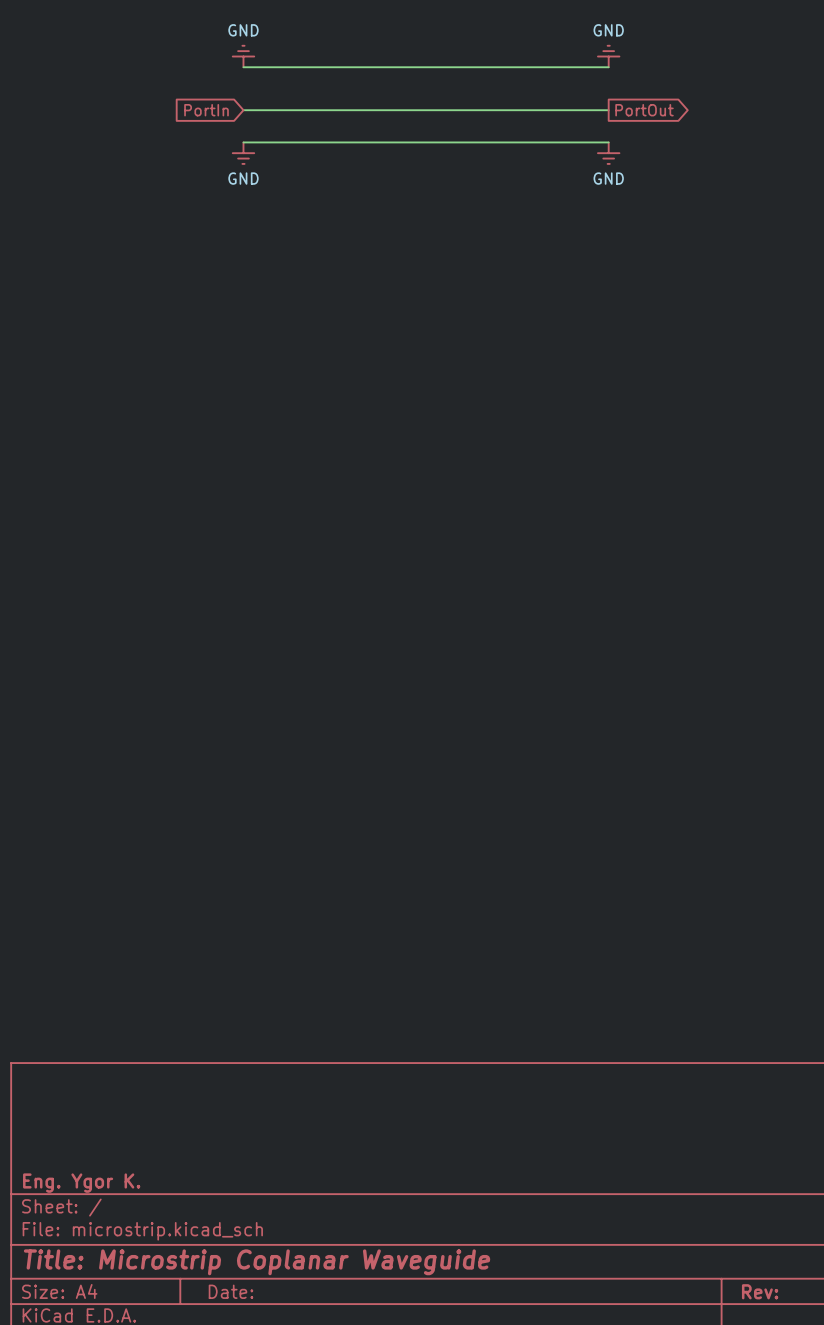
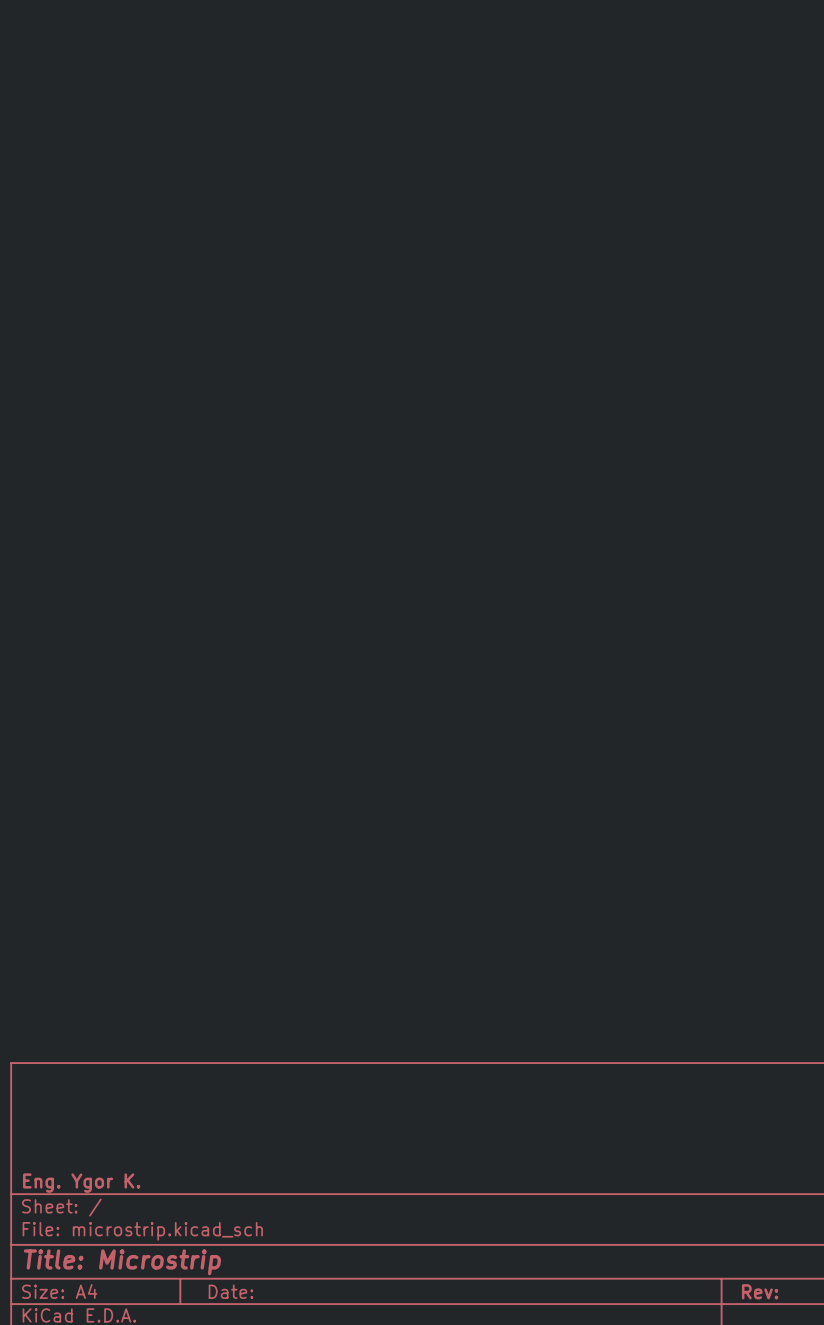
power symbol: GND (243, 56) -> none
power symbol: GND (608, 56) -> none
wire: (243, 67) (608, 67) -> none
global label: PortIn (206, 110) -> none
wire: (243, 110) (608, 110) -> none
global label: PortOut (644, 110) -> none
wire: (243, 142) (608, 142) -> none
power symbol: GND (243, 153) -> none
power symbol: GND (608, 153) -> none
title block: Title: Microstrip Coplanar Waveguide (257, 1262) -> Title: Microstrip (122, 1262)

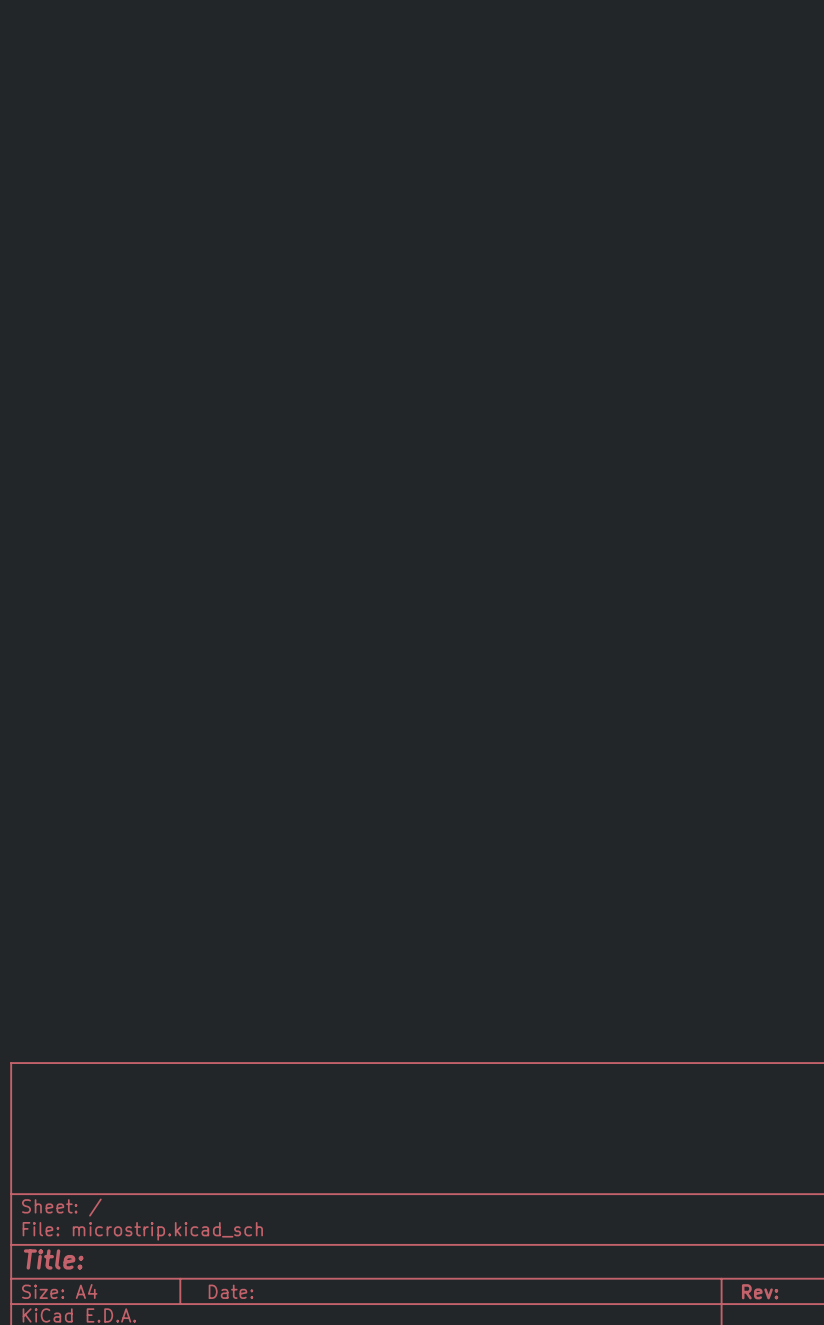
title block: Eng. Ygor K. (81, 1183) -> none
title block: Title: Microstrip (122, 1262) -> Title: (53, 1259)

